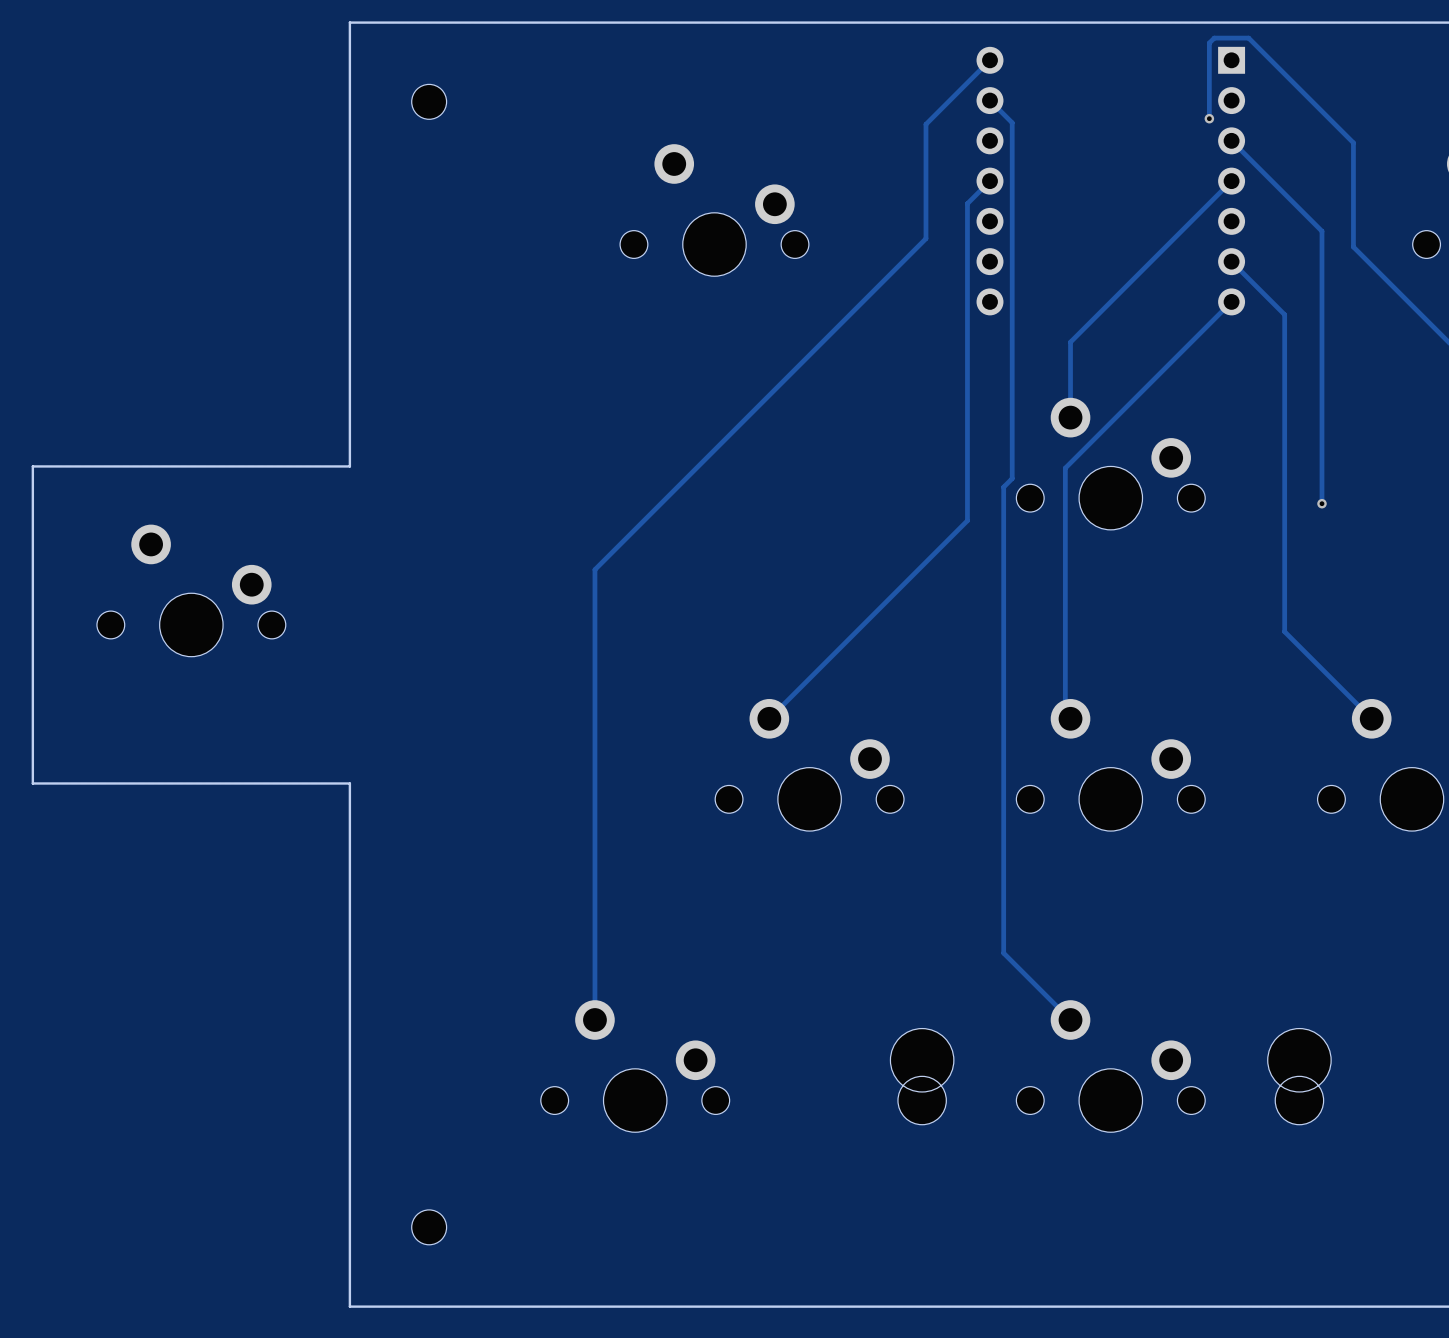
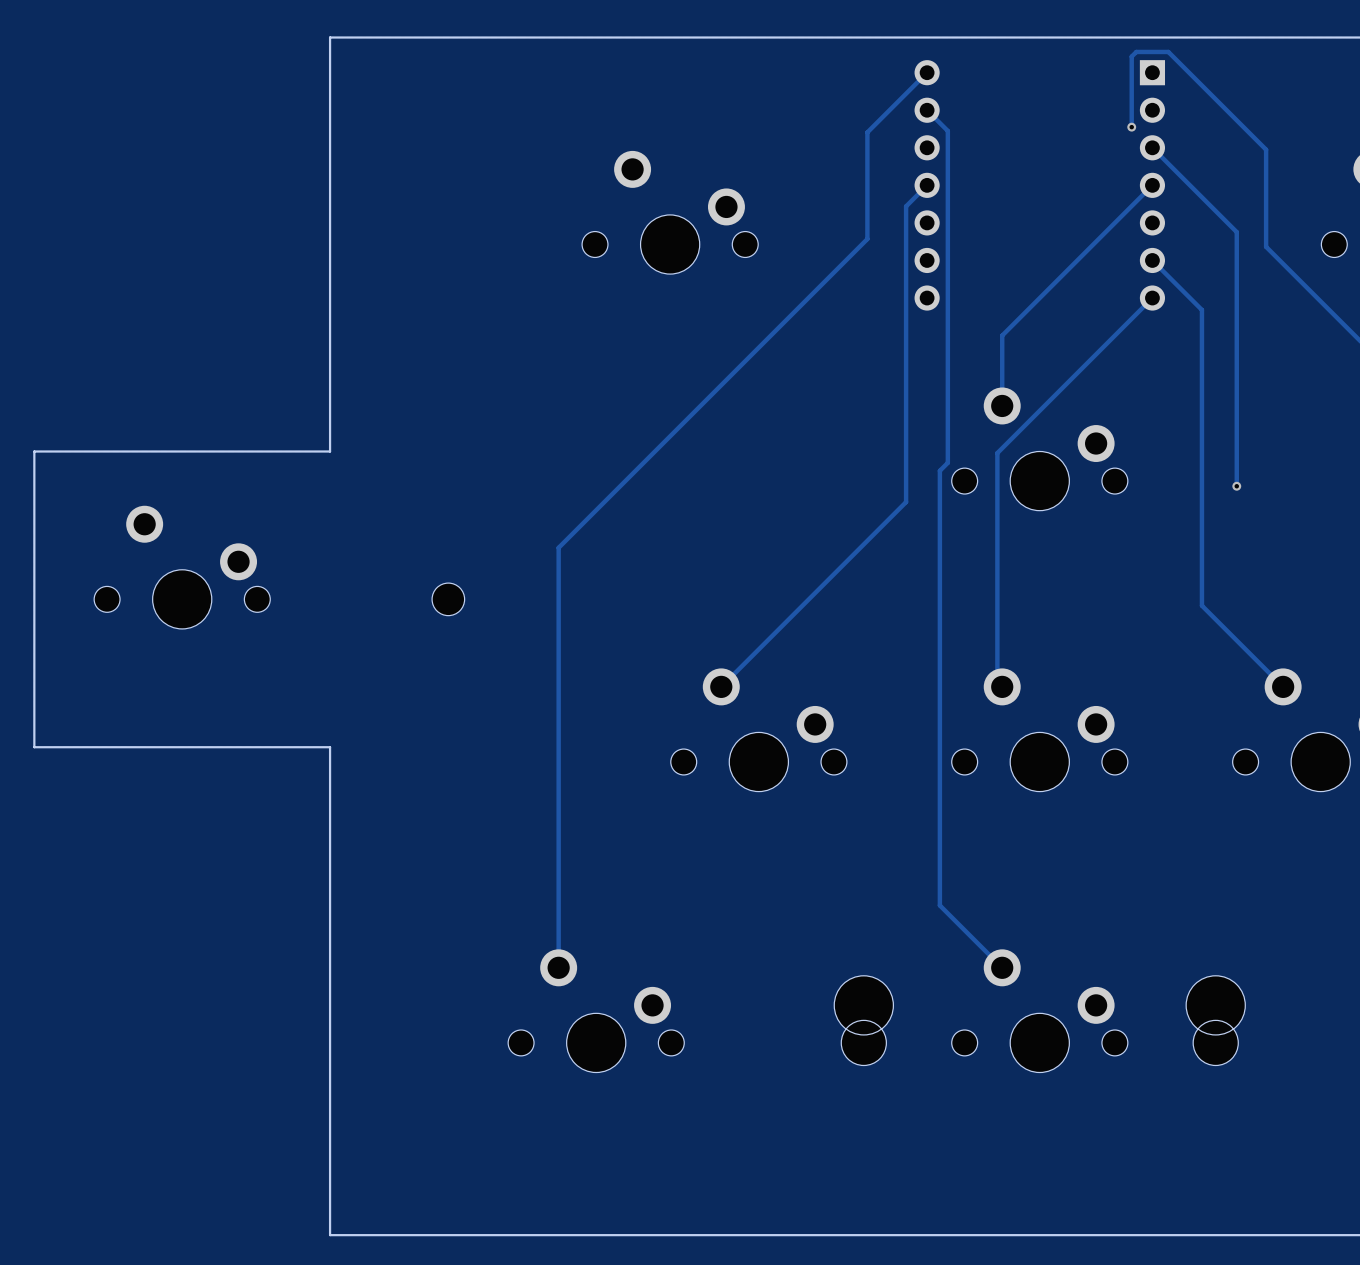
part: (429, 101) -> none
part: none -> (448, 599)
part: (429, 1227) -> none

